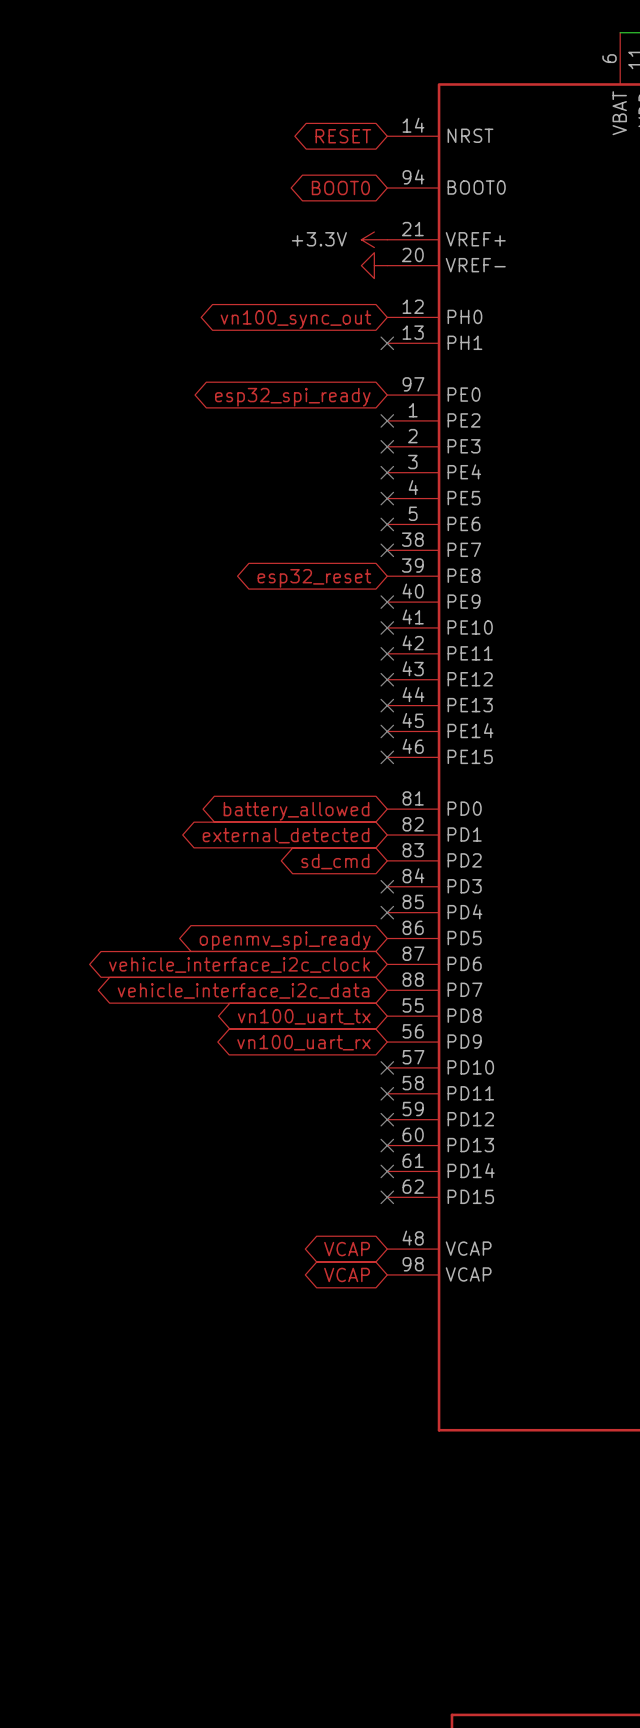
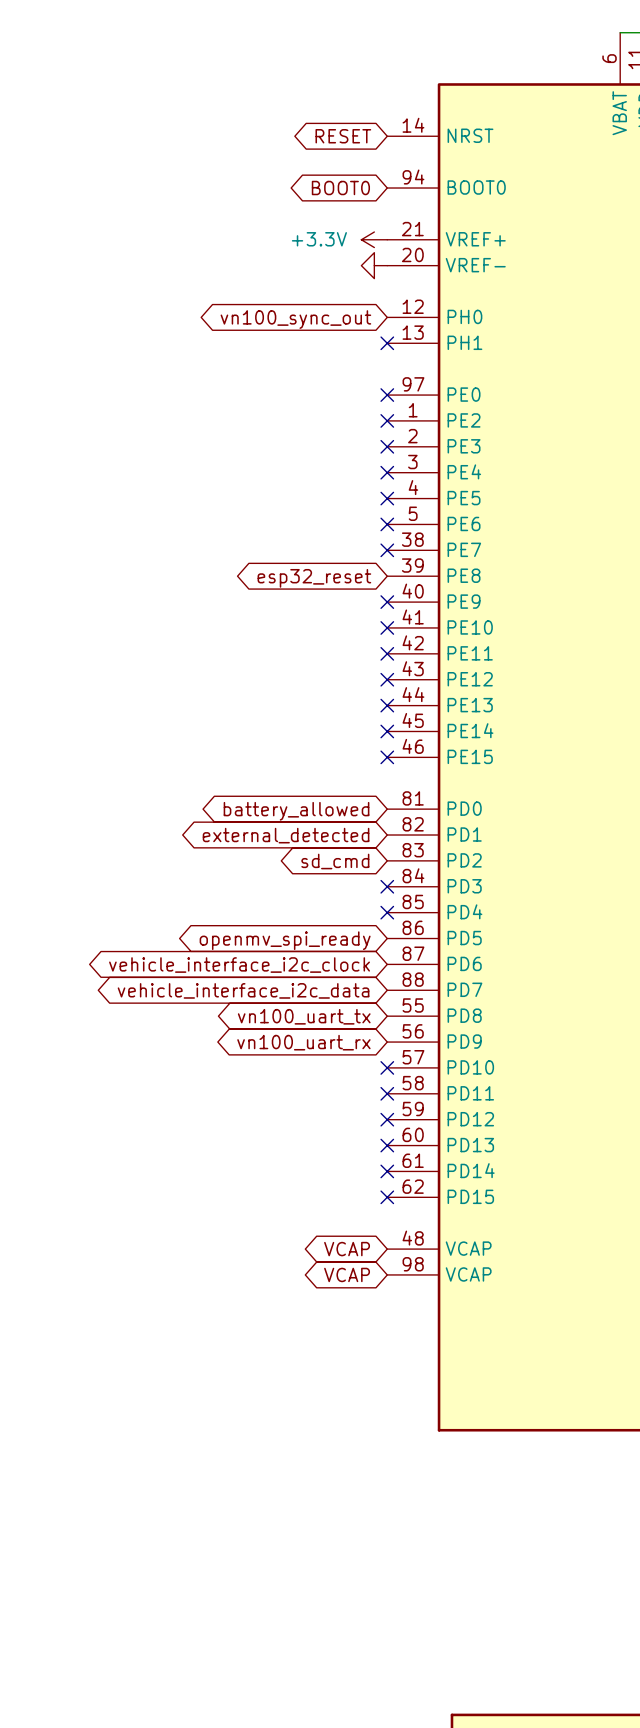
no-connect mark: none -> (387, 395)
global label: esp32_spi_ready (292, 397) -> none

